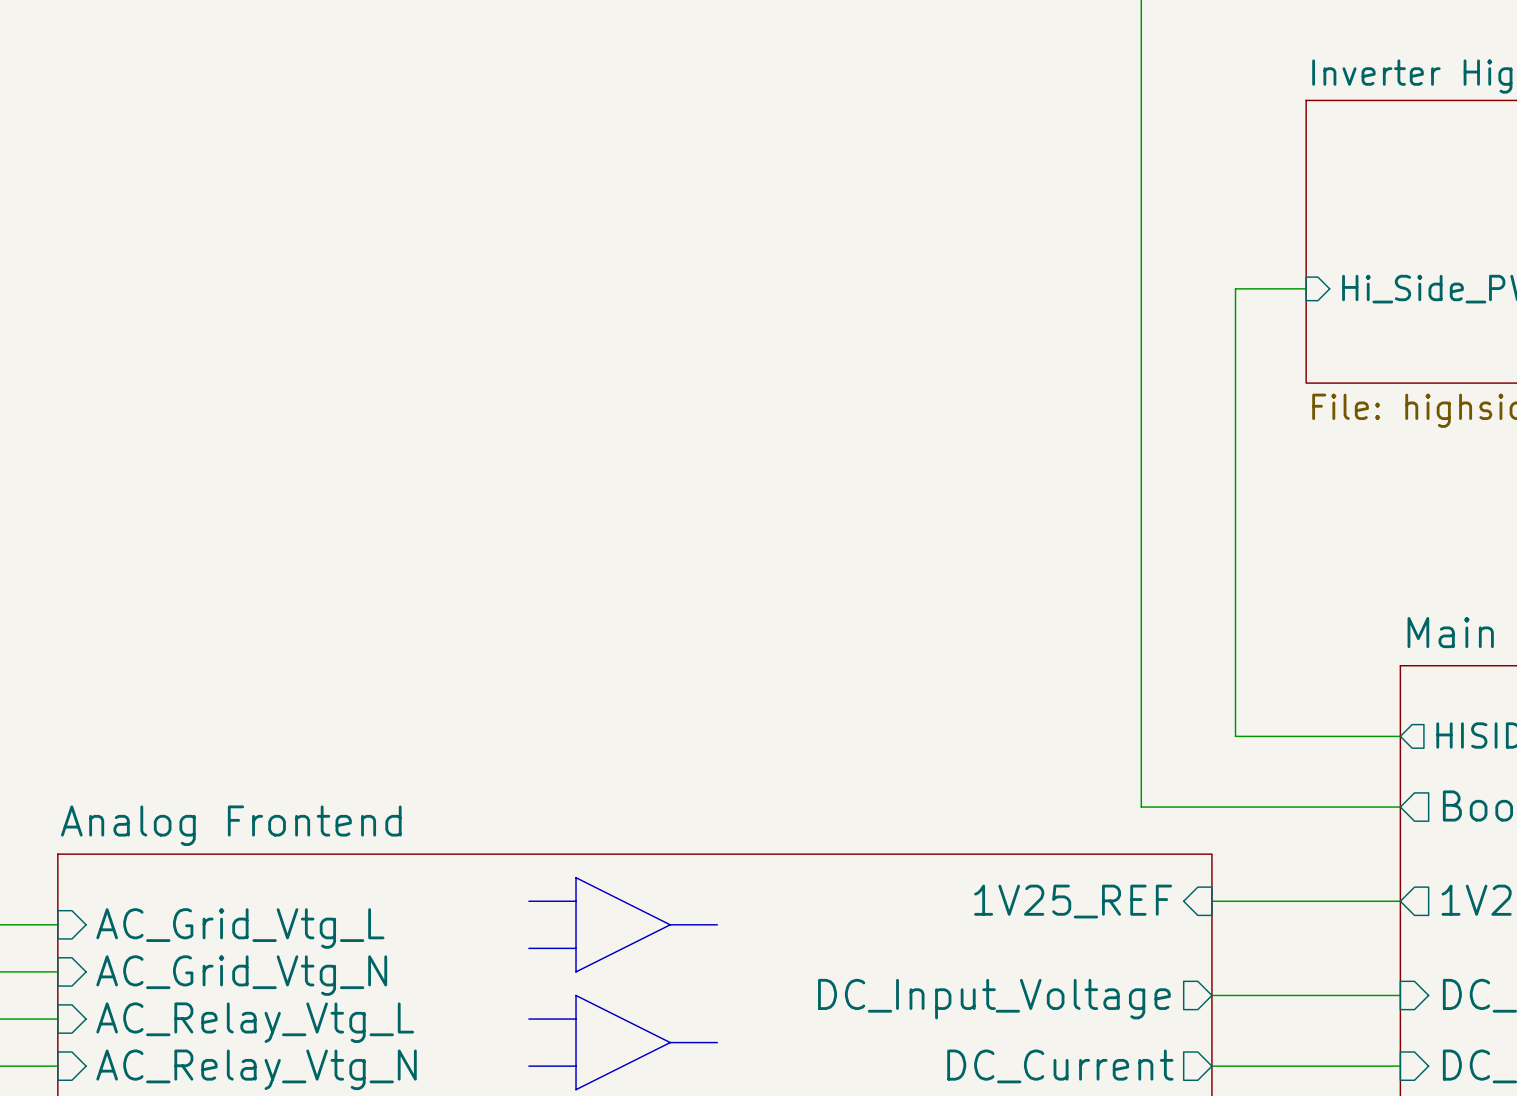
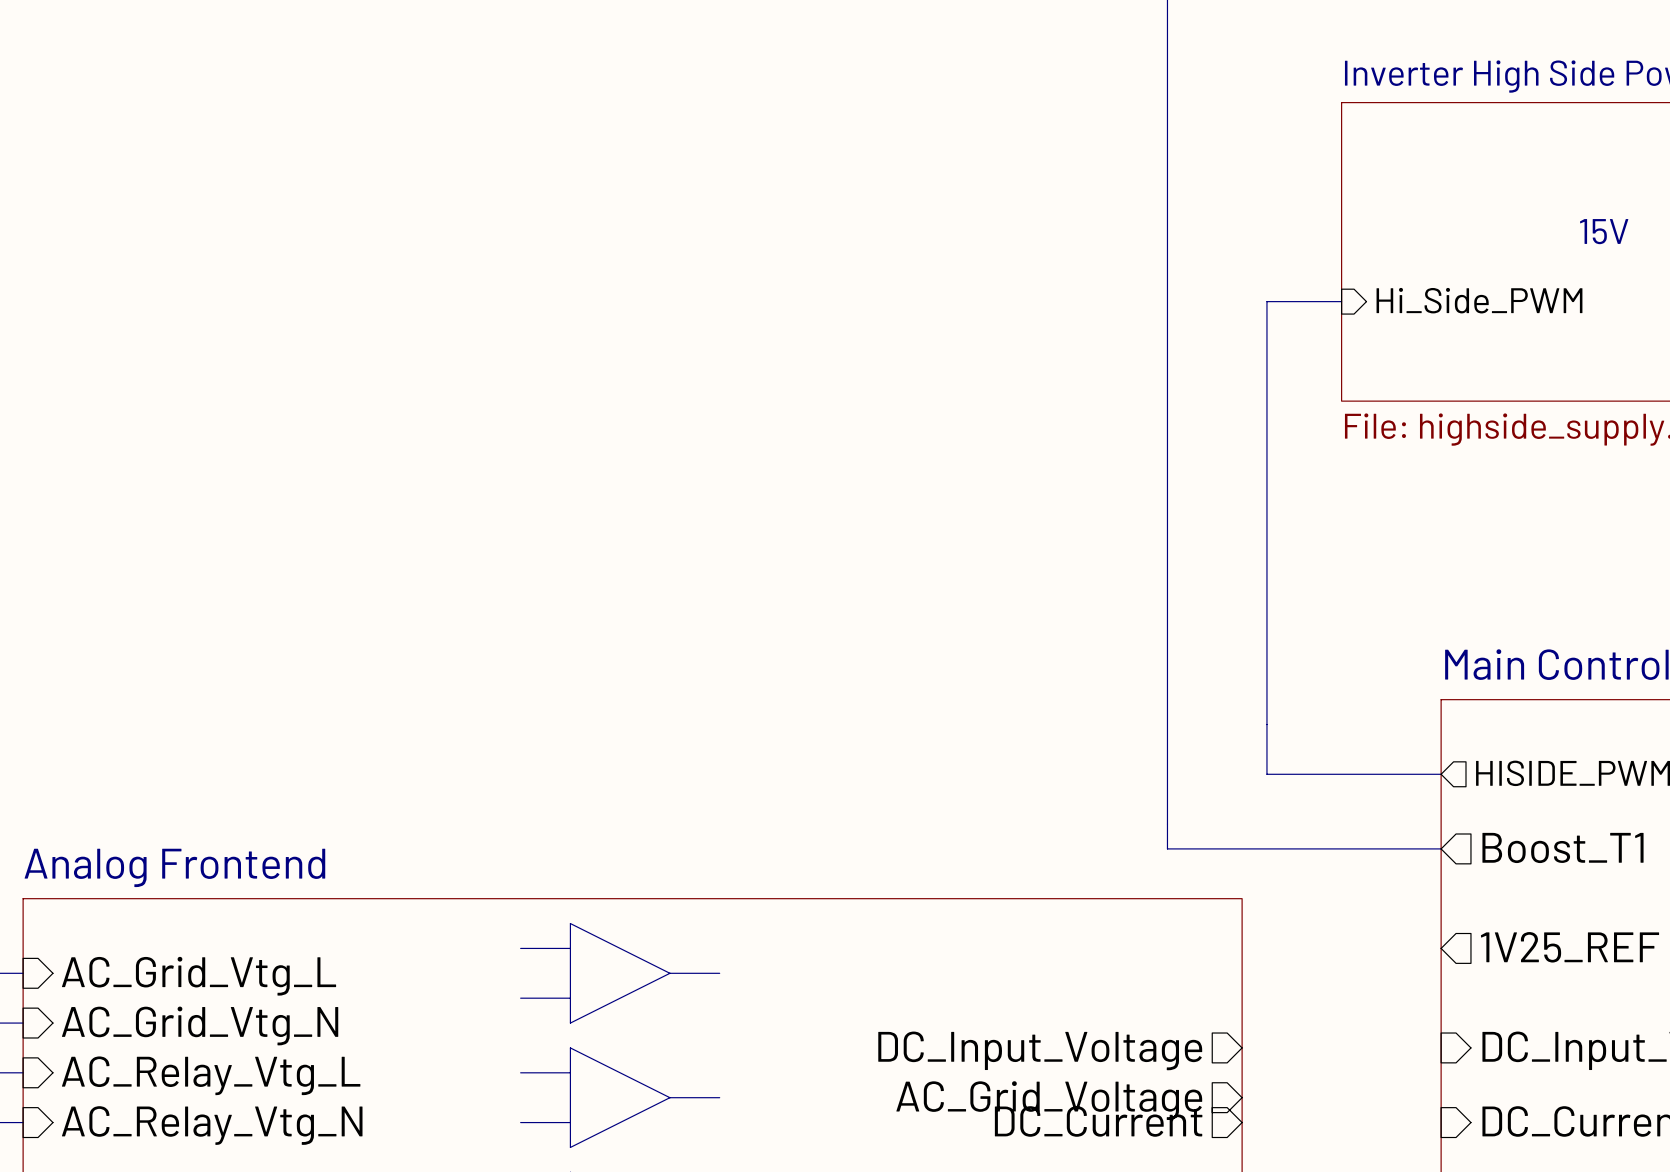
sheet pin: 1V25_REF (1073, 901) -> none
wire: (1211, 901) (1400, 901) -> none
wire: (1211, 995) (1400, 995) -> none
sheet pin: none -> AC_Grid_Voltage (1049, 1100)
wire: (1211, 1066) (1400, 1066) -> none

